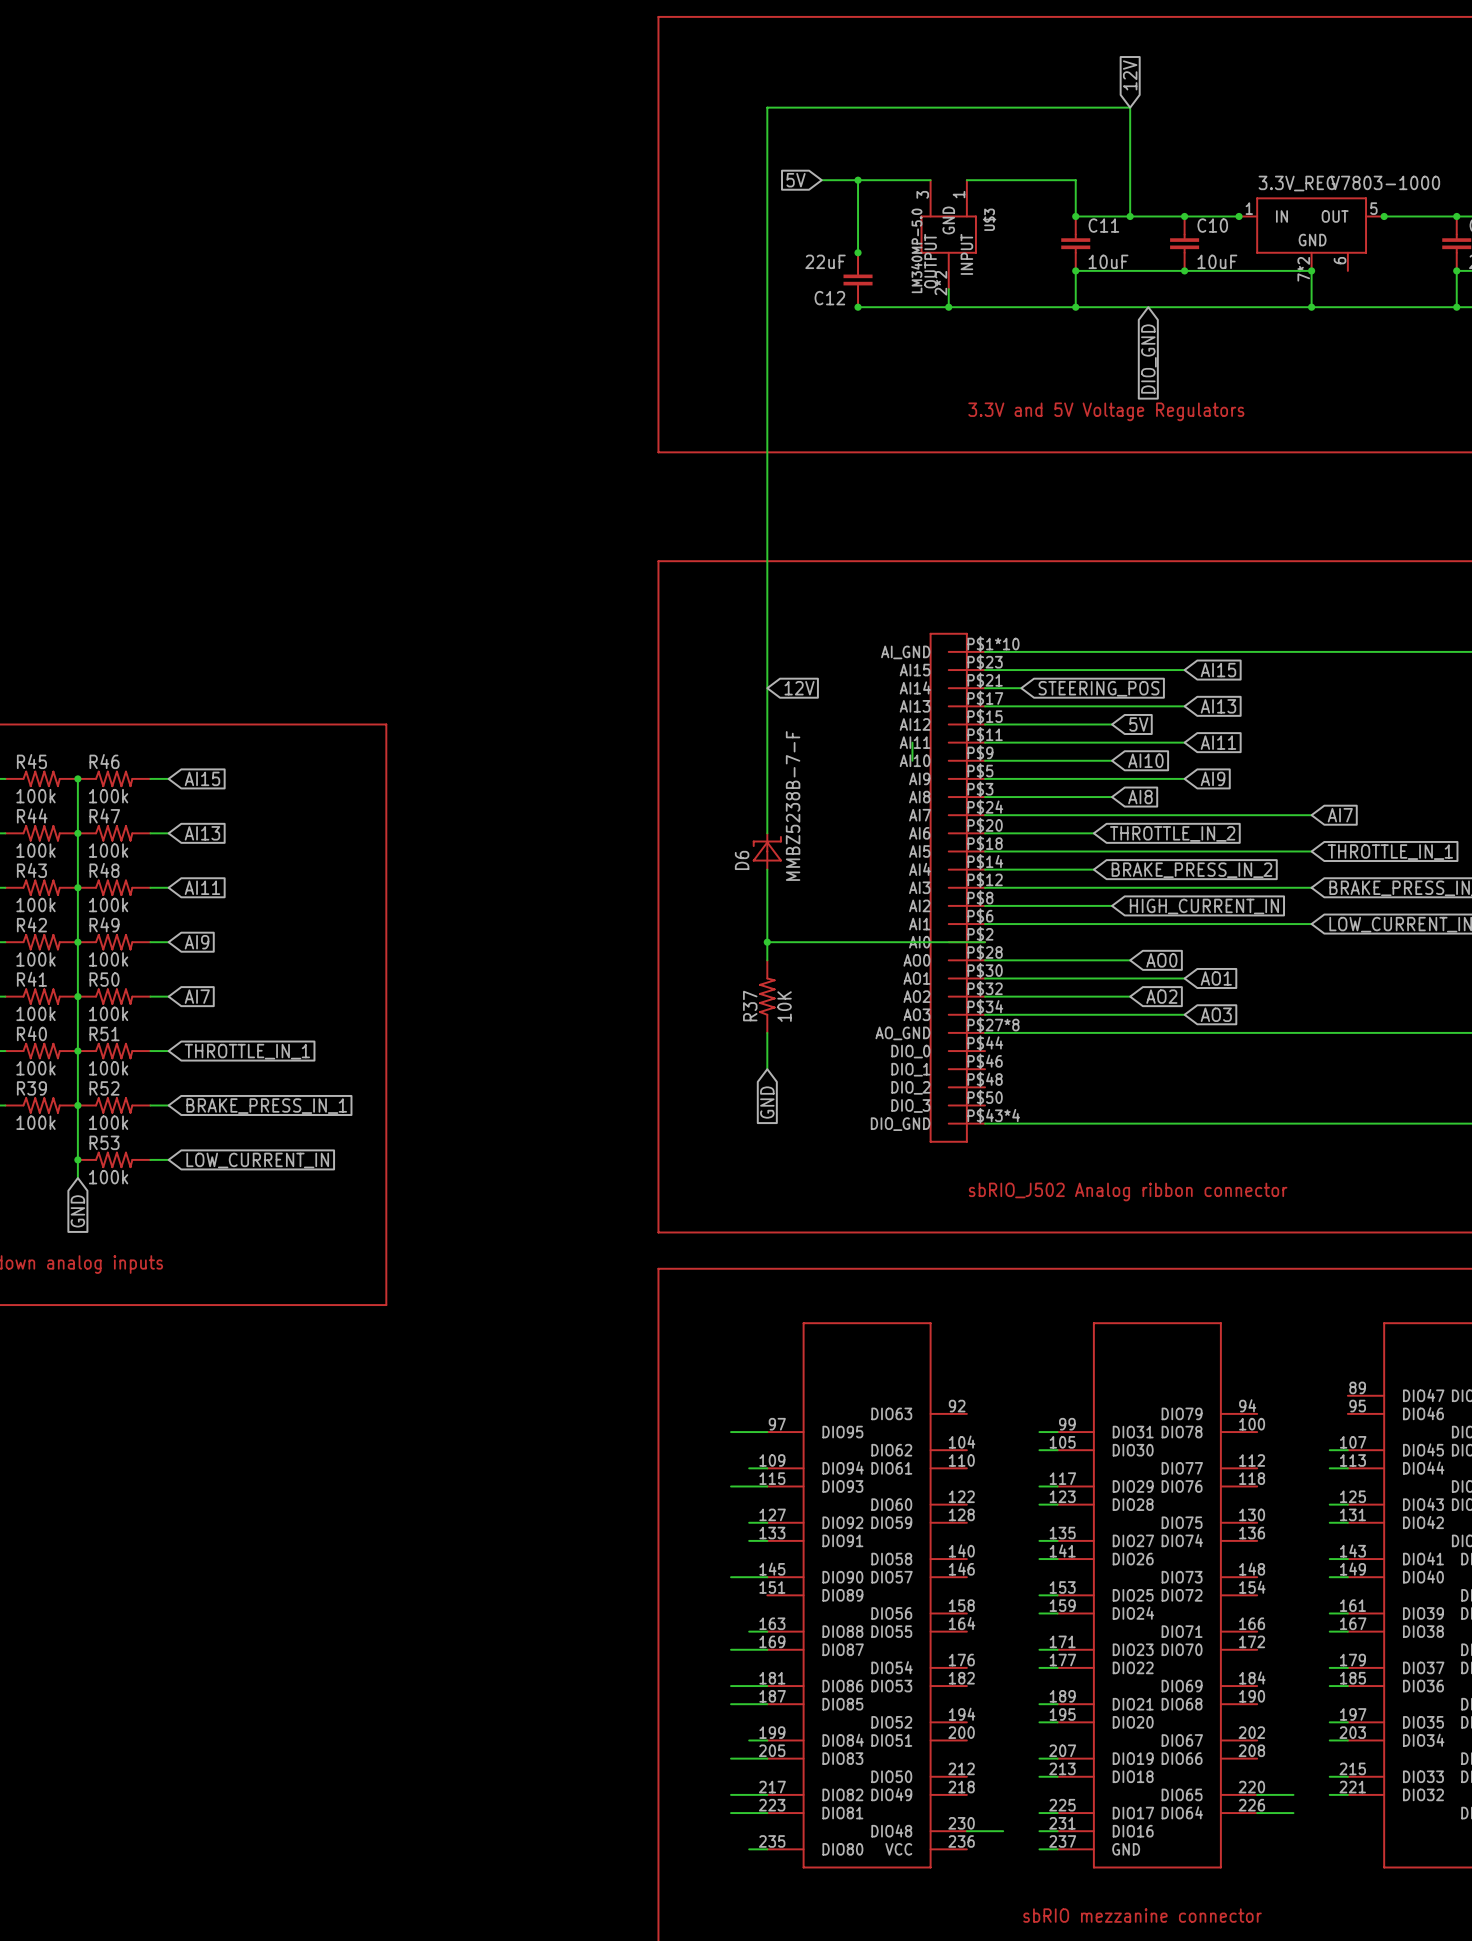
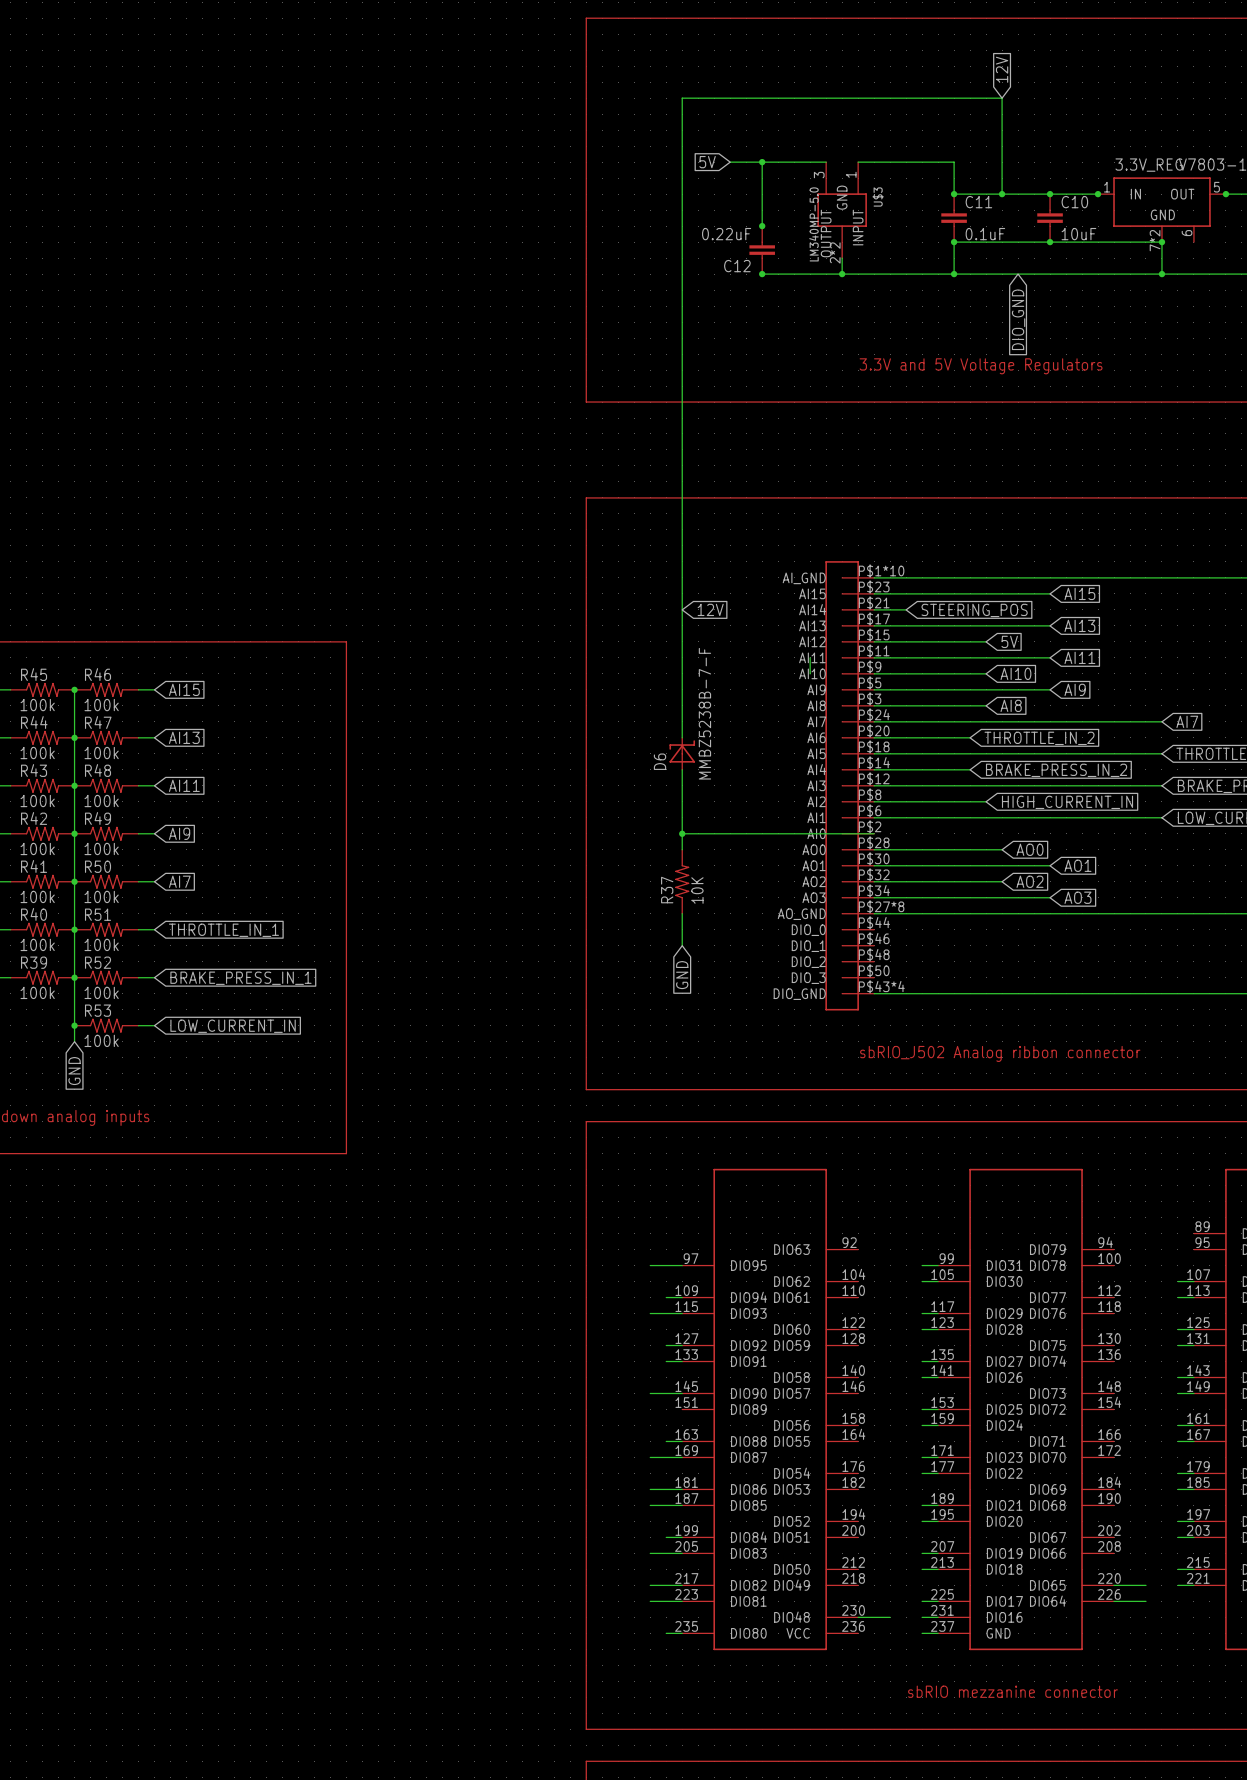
C12 value: 22uF (825, 261) -> 0.22uF (726, 234)
C11 value: 10uF (1108, 261) -> 0.1uF (985, 234)

